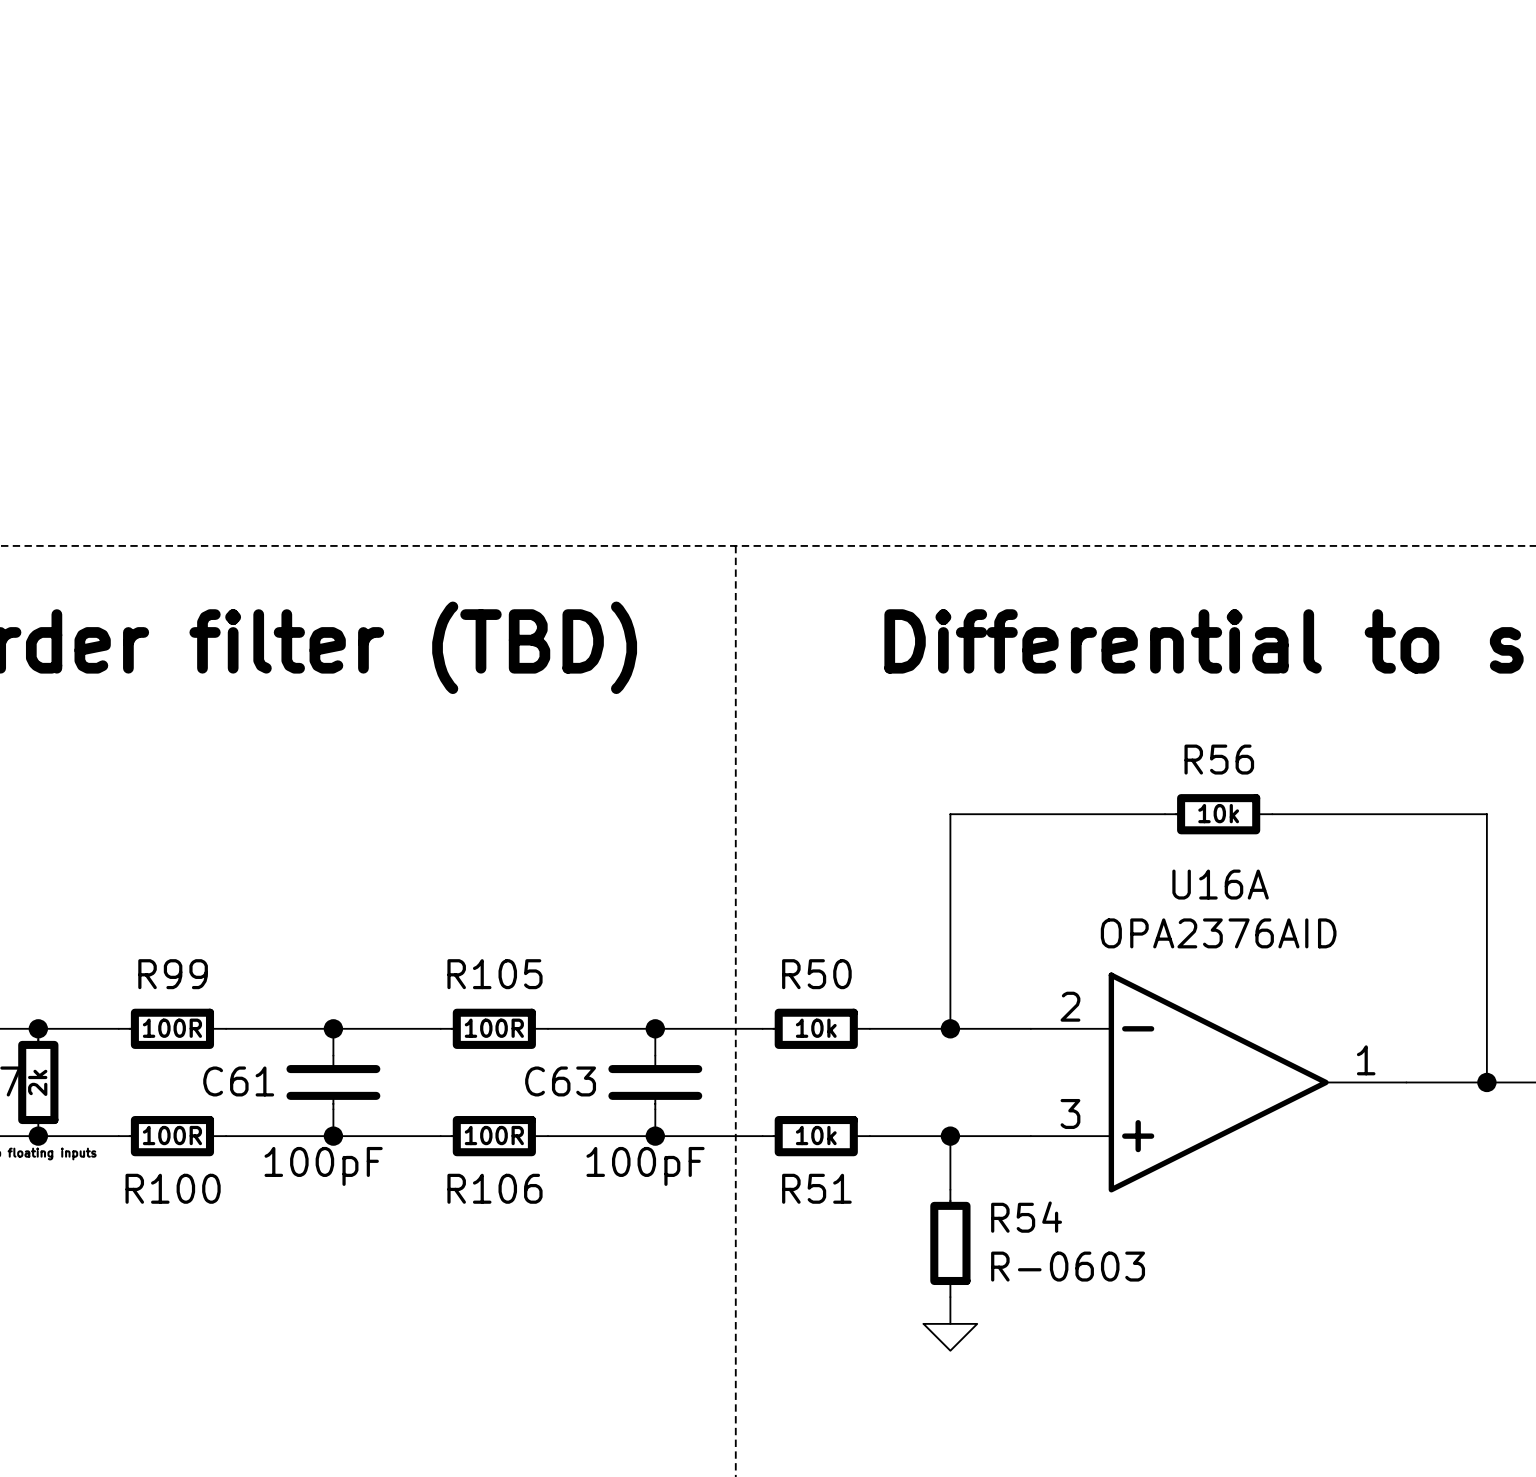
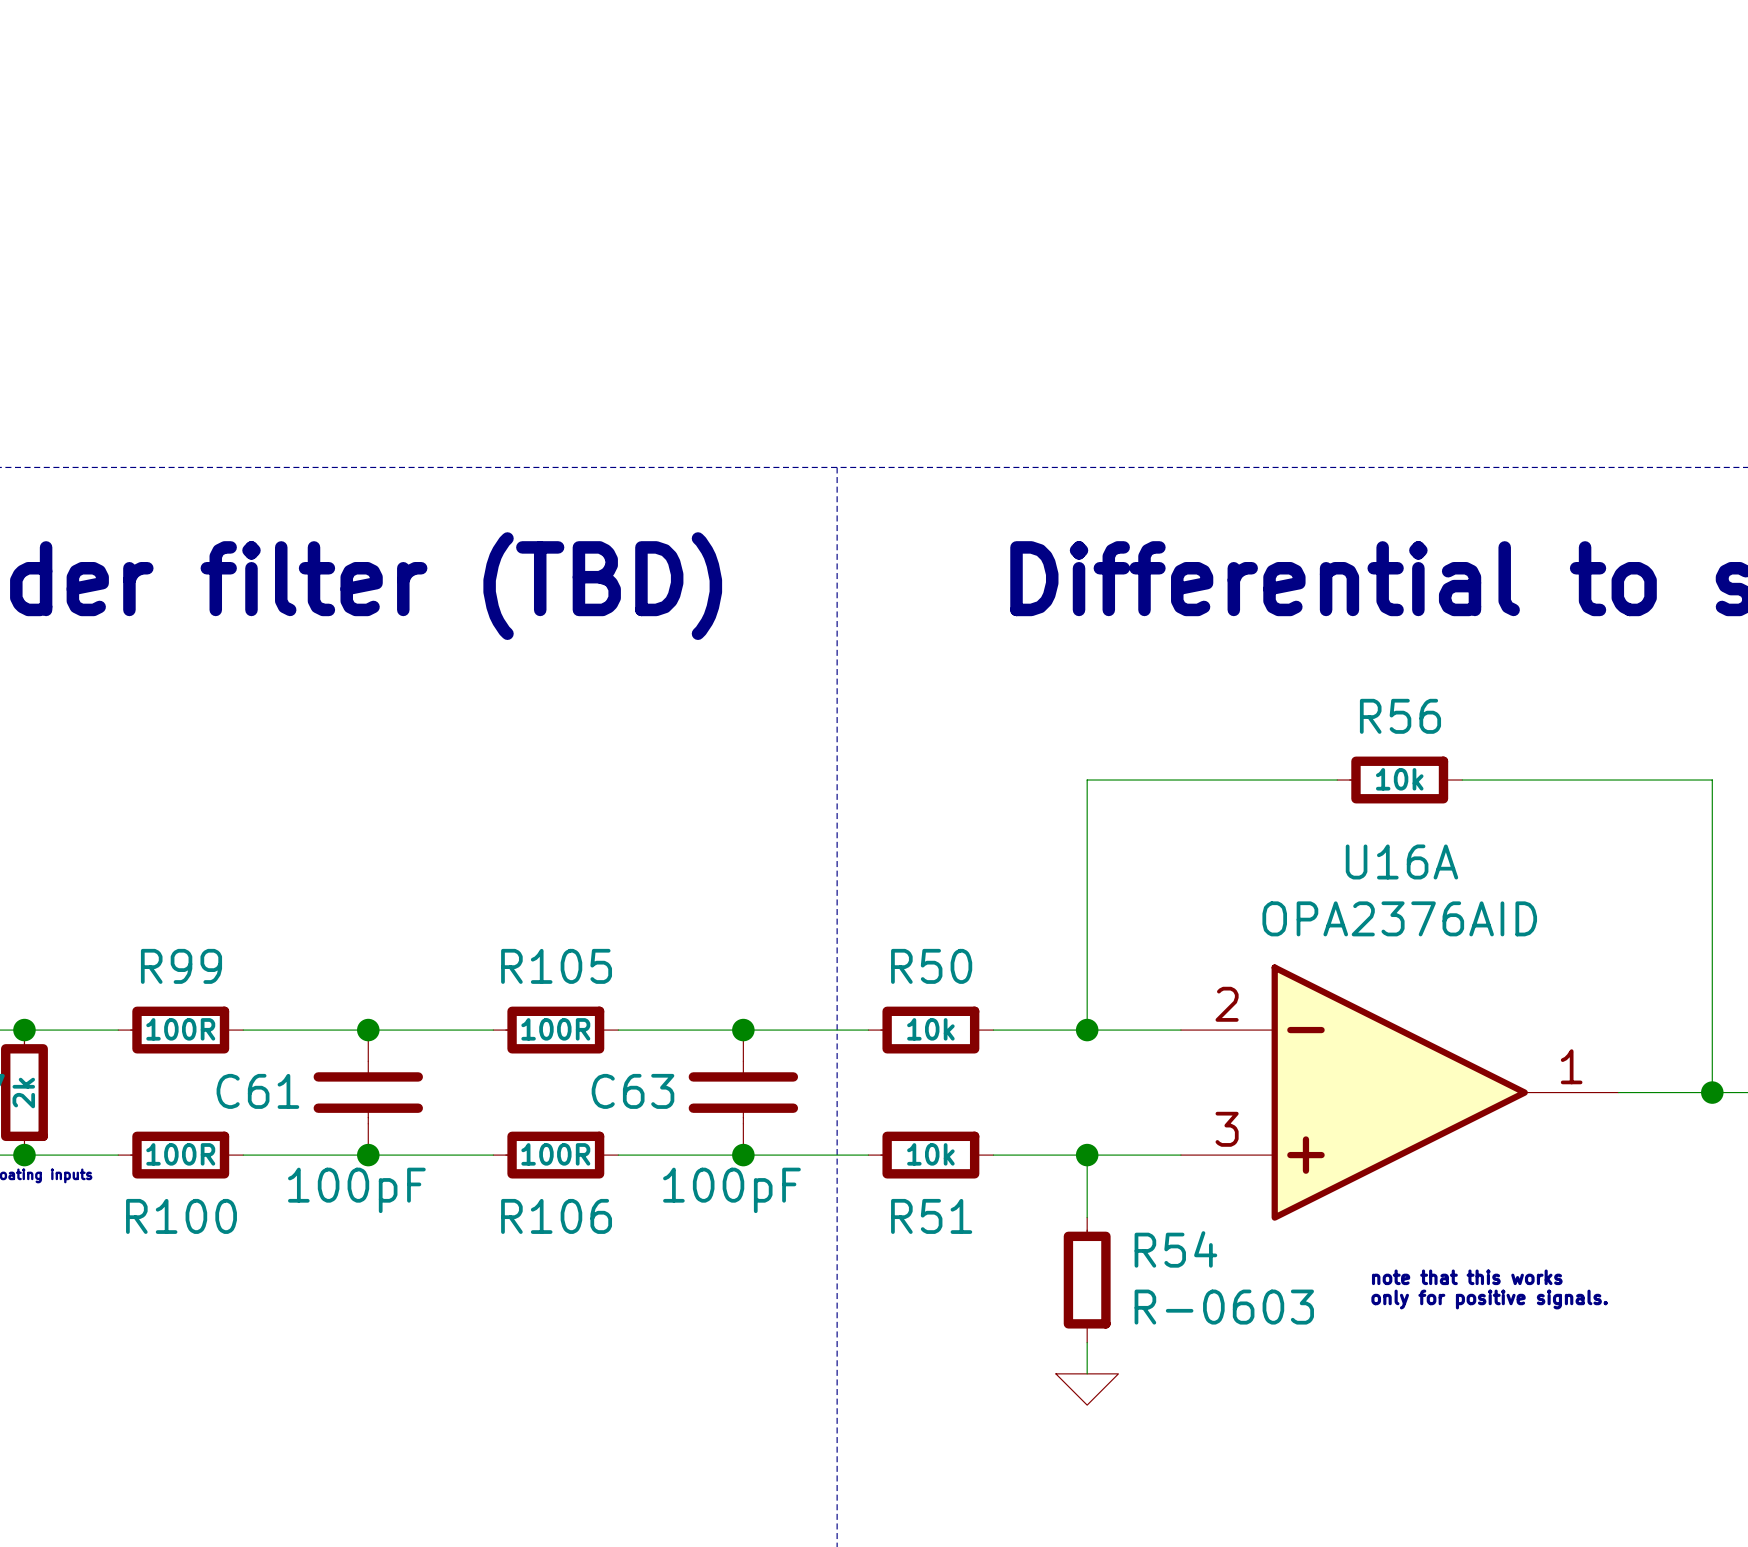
text: none -> note that this works (1467, 1277)
text: none -> only for positive signals. (1489, 1299)

